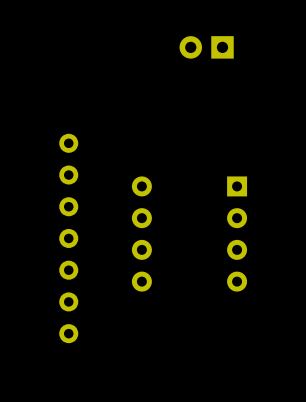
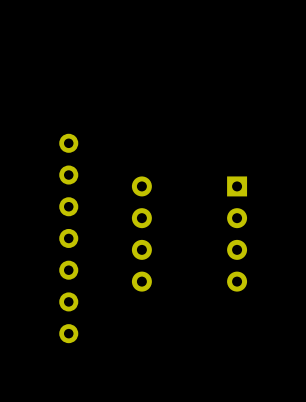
part: (206, 47) -> none

